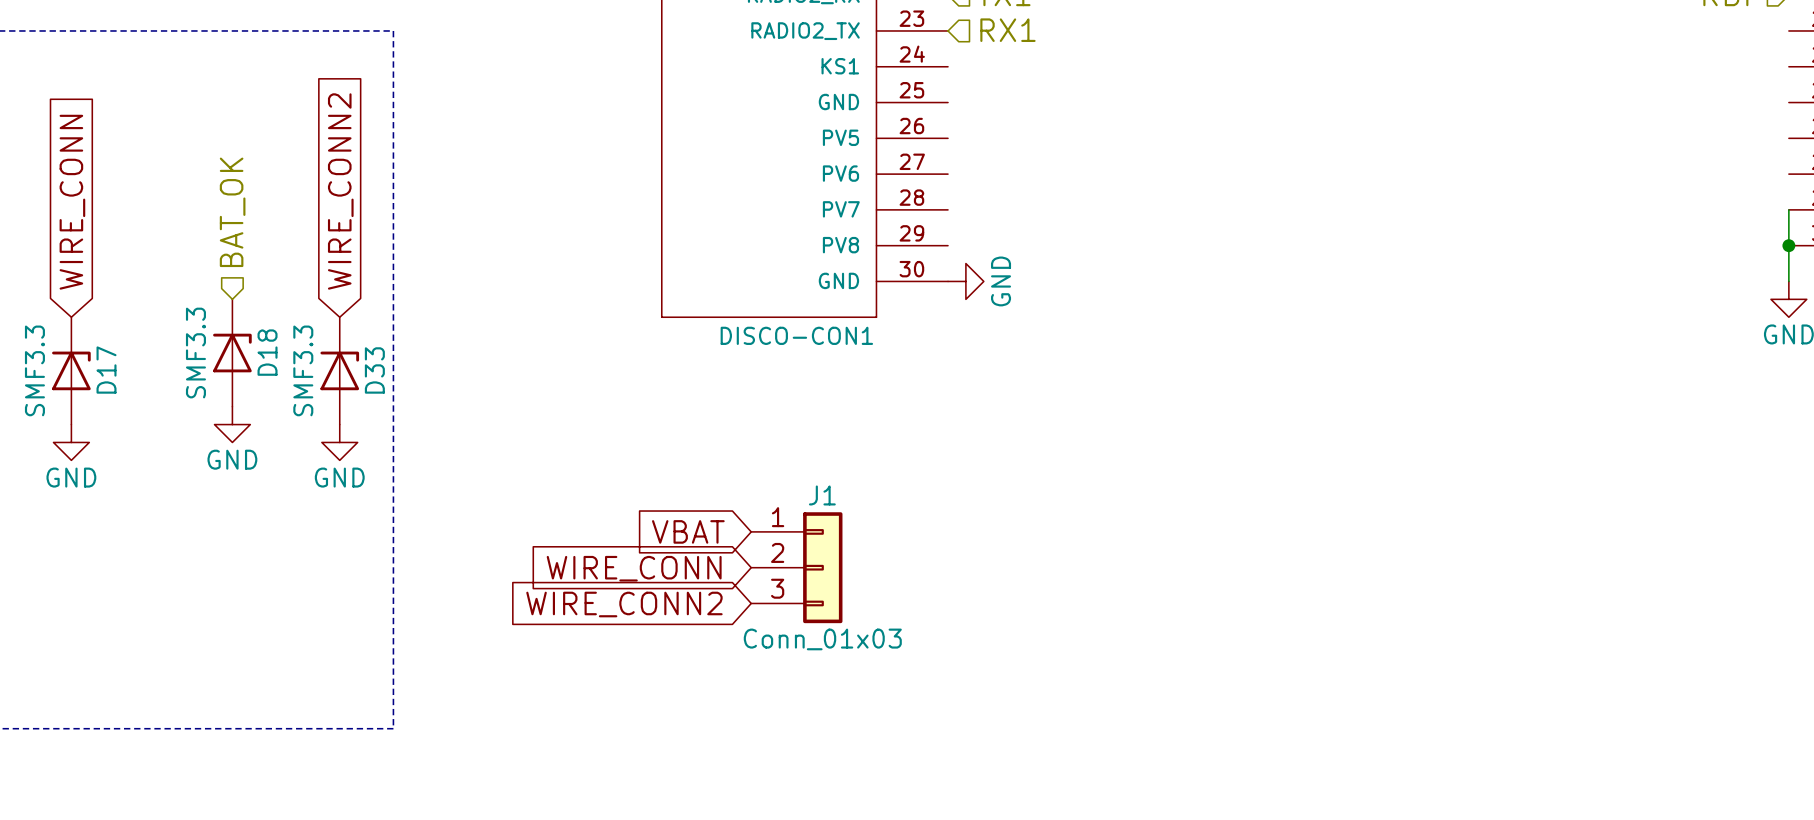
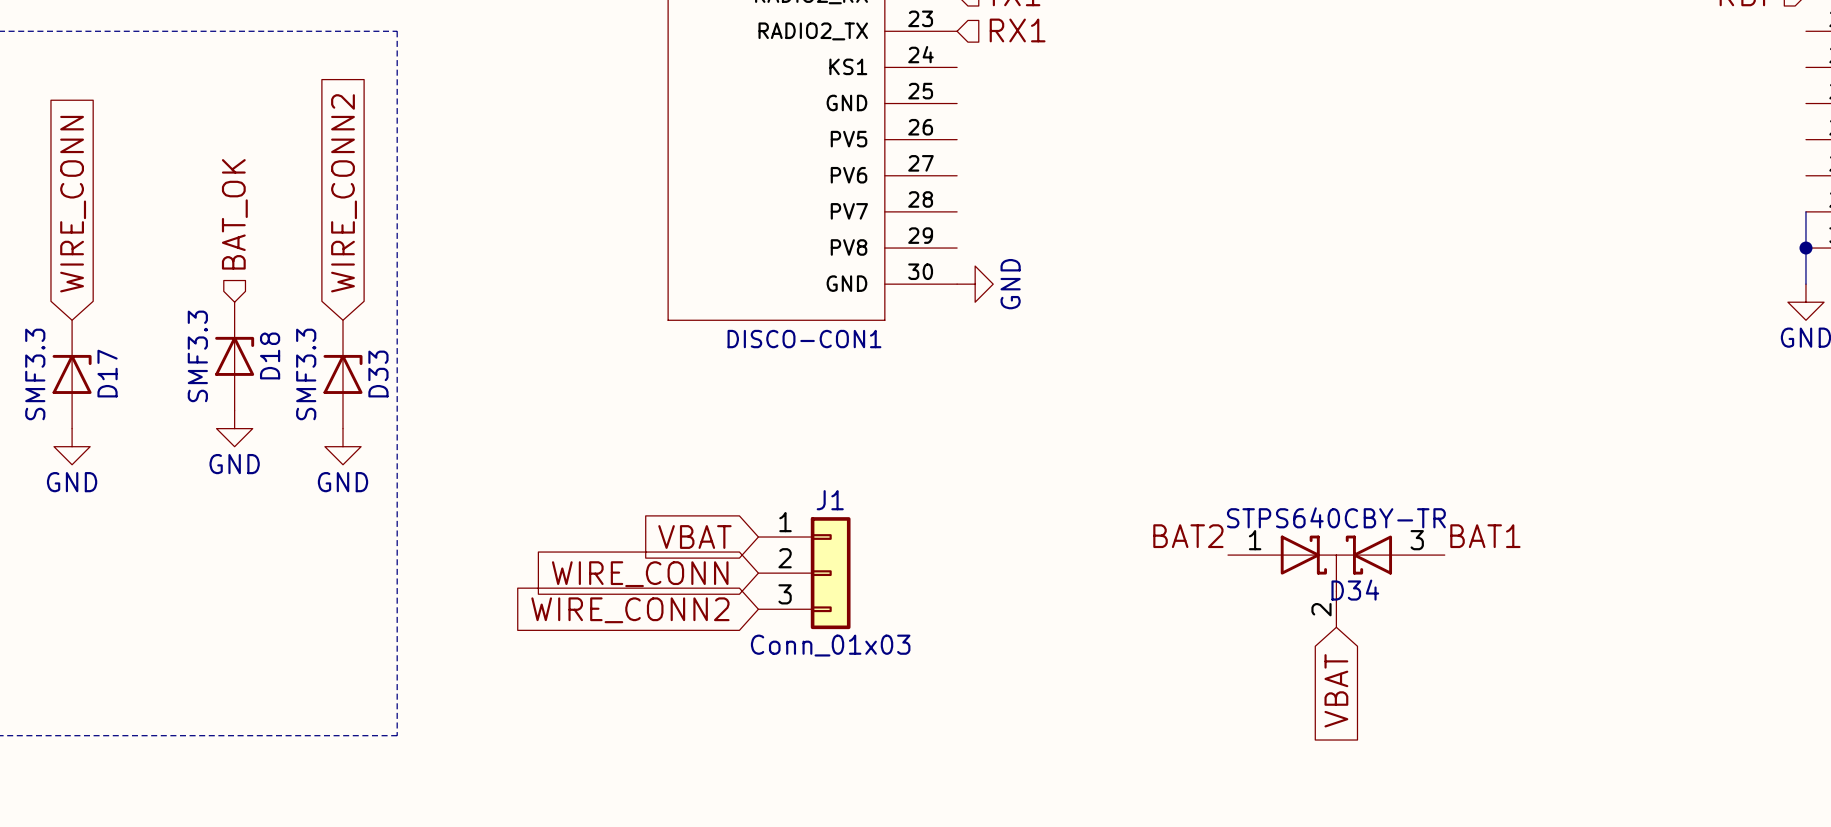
label: none -> BAT2 (1188, 536)
label: none -> BAT1 (1485, 536)
D34: none -> STPS640CBY-TR (1336, 581)
global label: none -> VBAT (1336, 690)

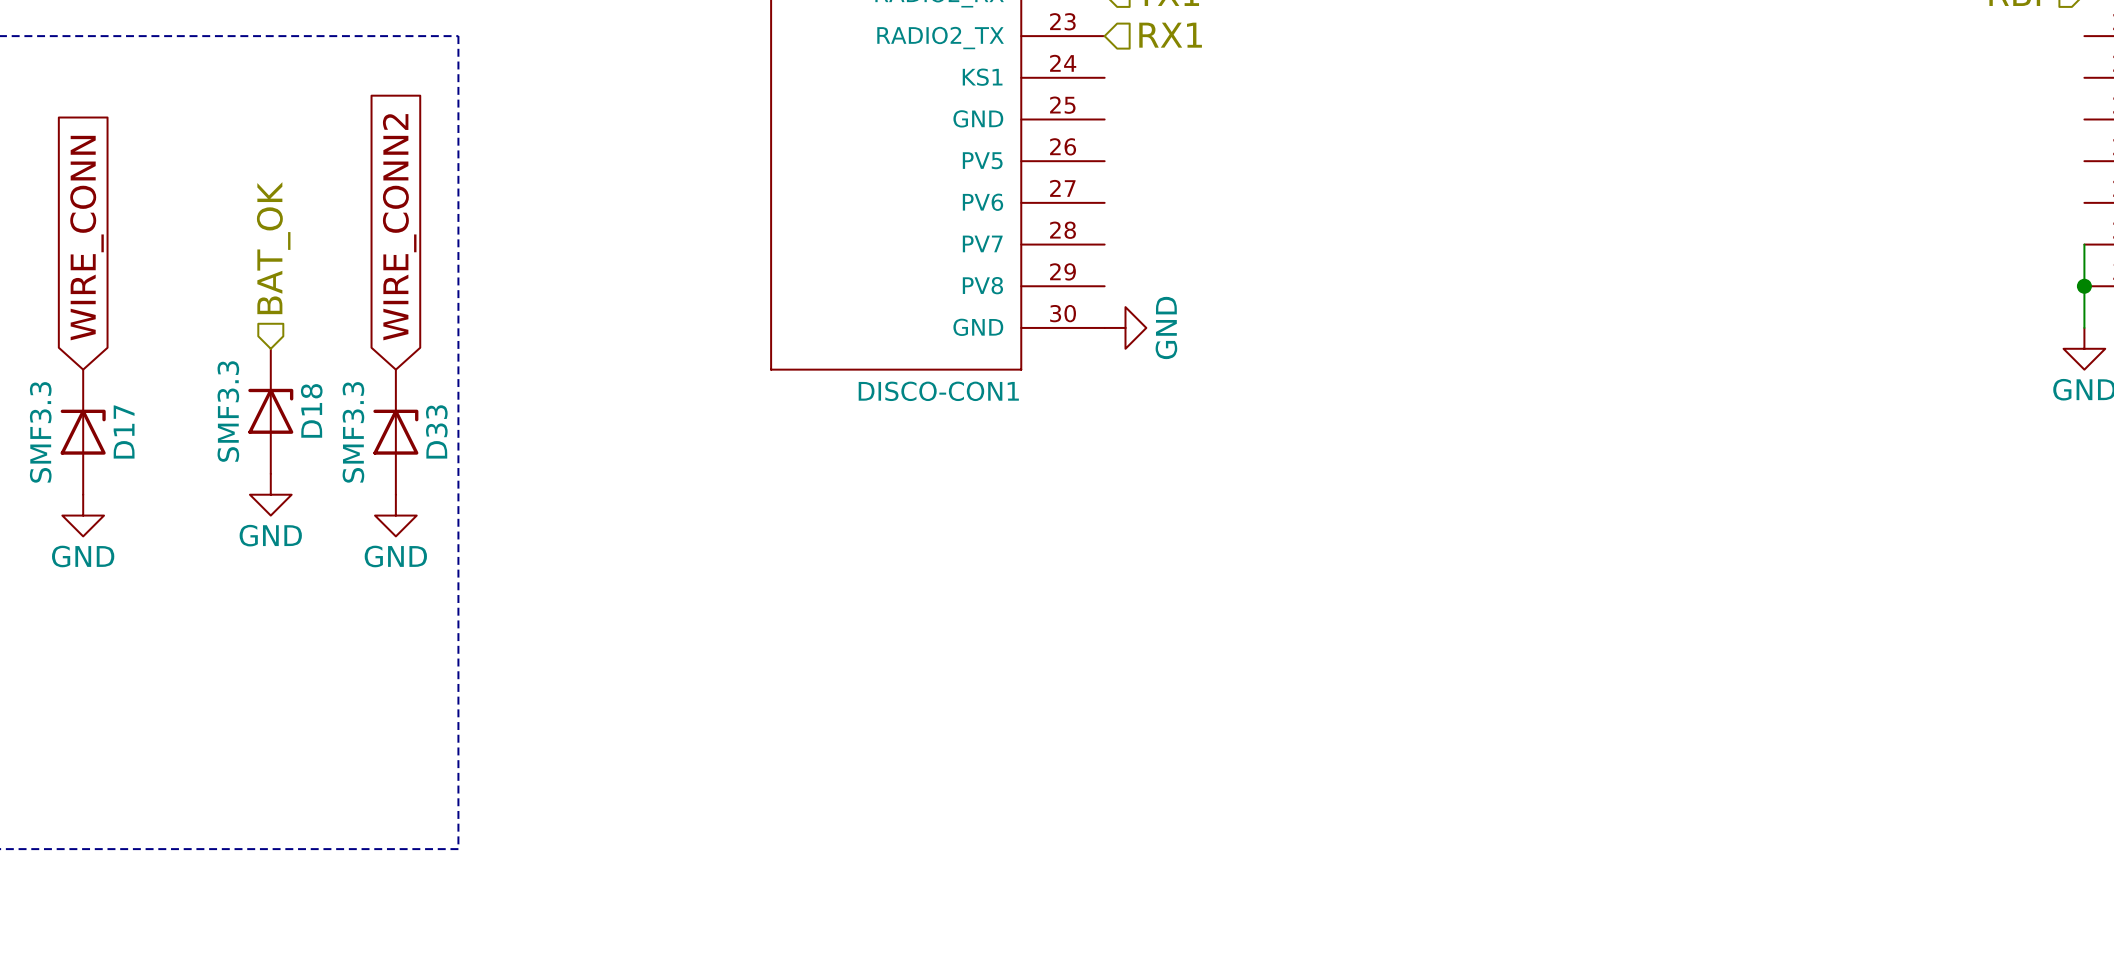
label: BAT2 (1188, 536) -> none
label: BAT1 (1485, 536) -> none
global label: VBAT (694, 537) -> none
J1: Conn_01x03 (804, 573) -> none
global label: WIRE_CONN (640, 574) -> none
D34: STPS640CBY-TR (1336, 581) -> none
global label: WIRE_CONN2 (630, 610) -> none
global label: VBAT (1336, 690) -> none

